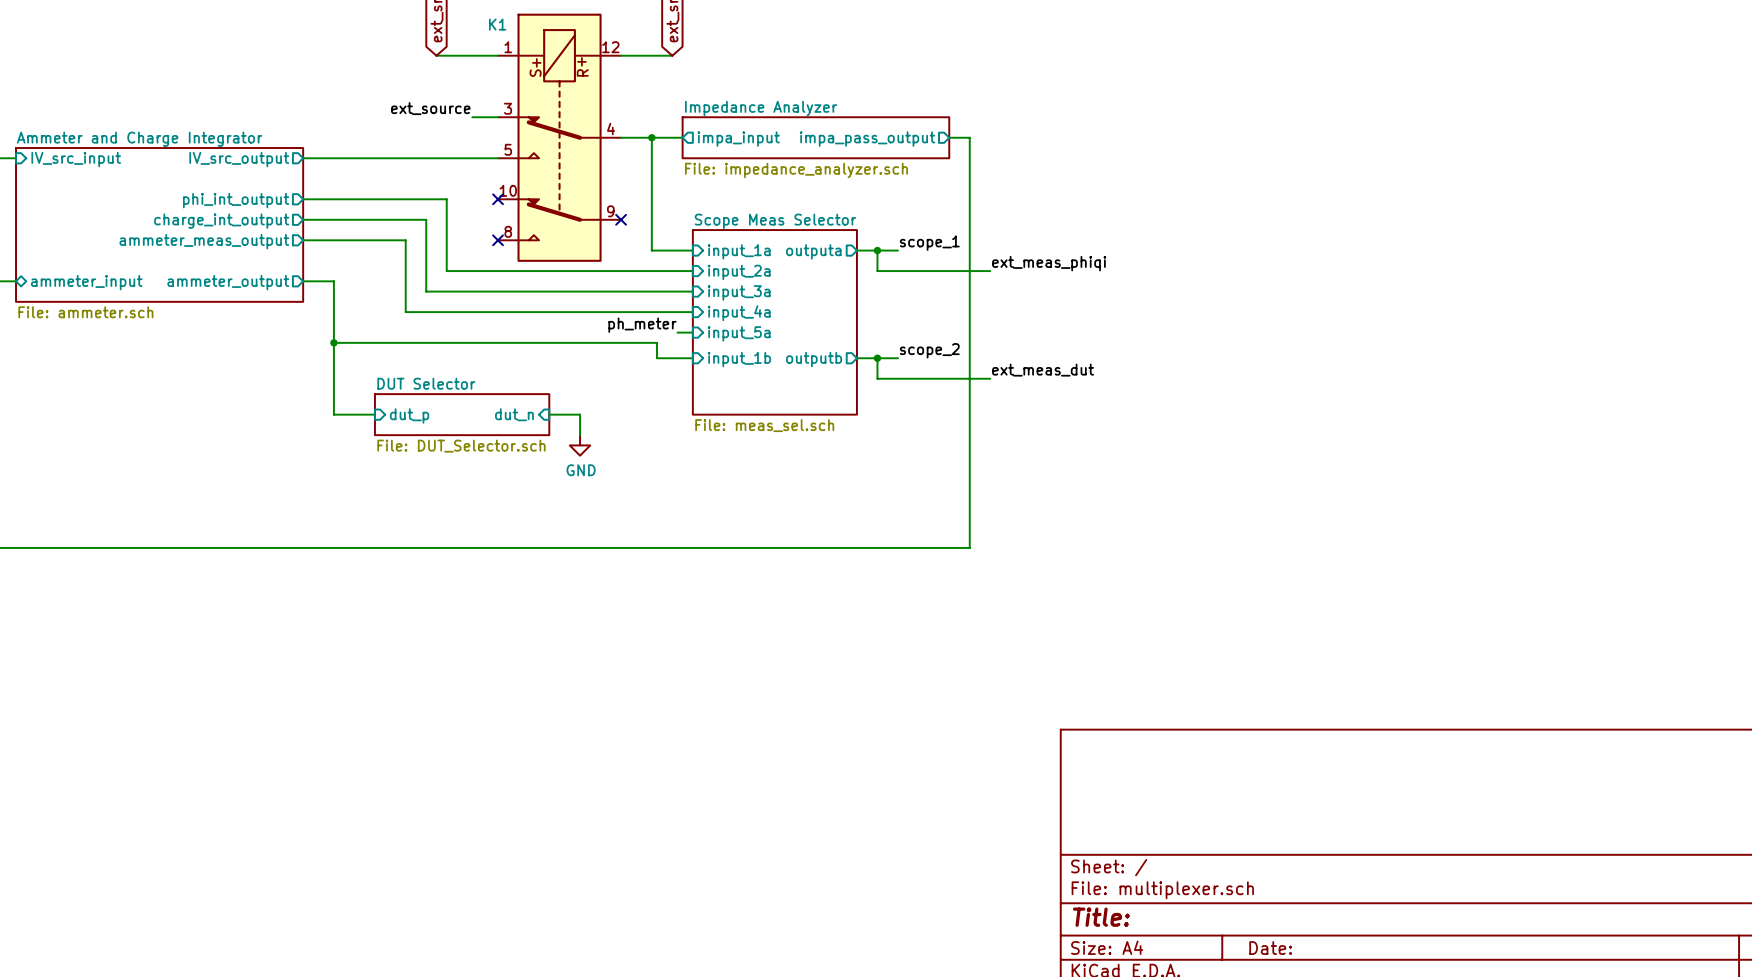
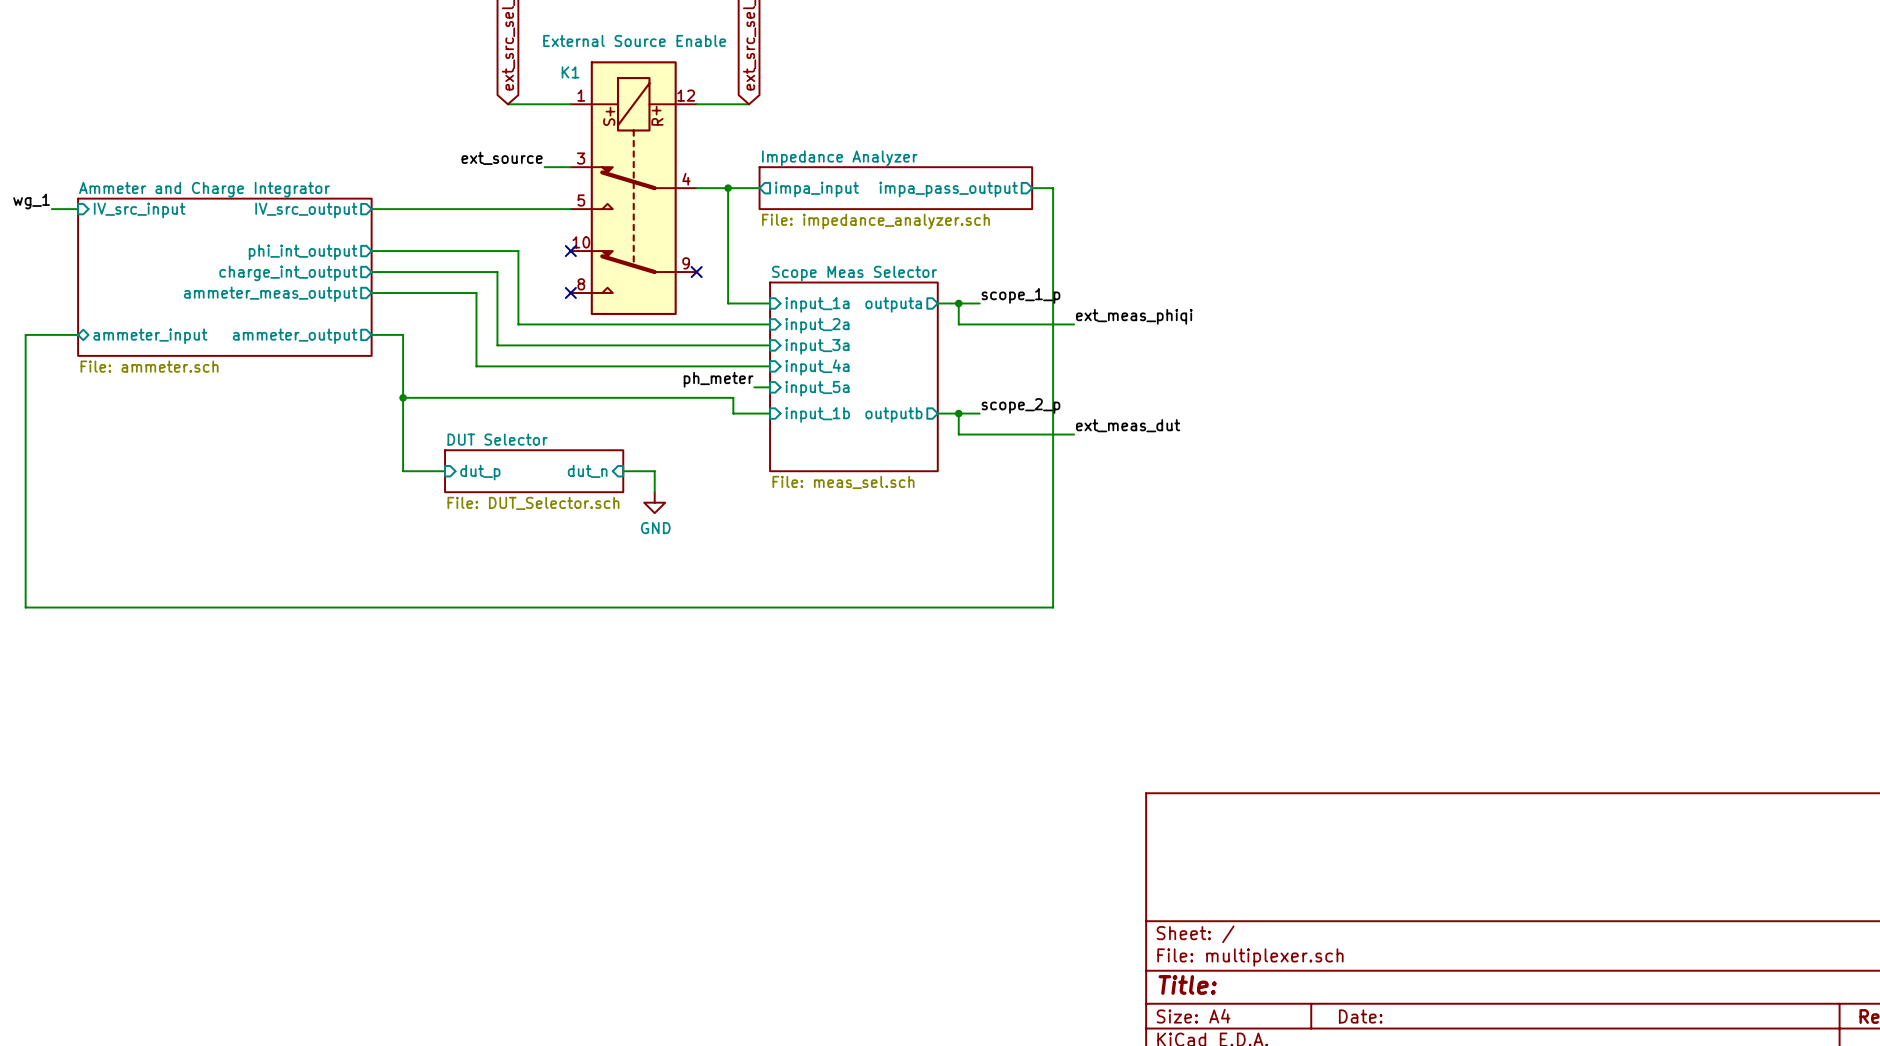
label: scope_1 (929, 243) -> scope_1_p (1020, 295)
label: scope_2 (929, 350) -> scope_2_p (1020, 405)

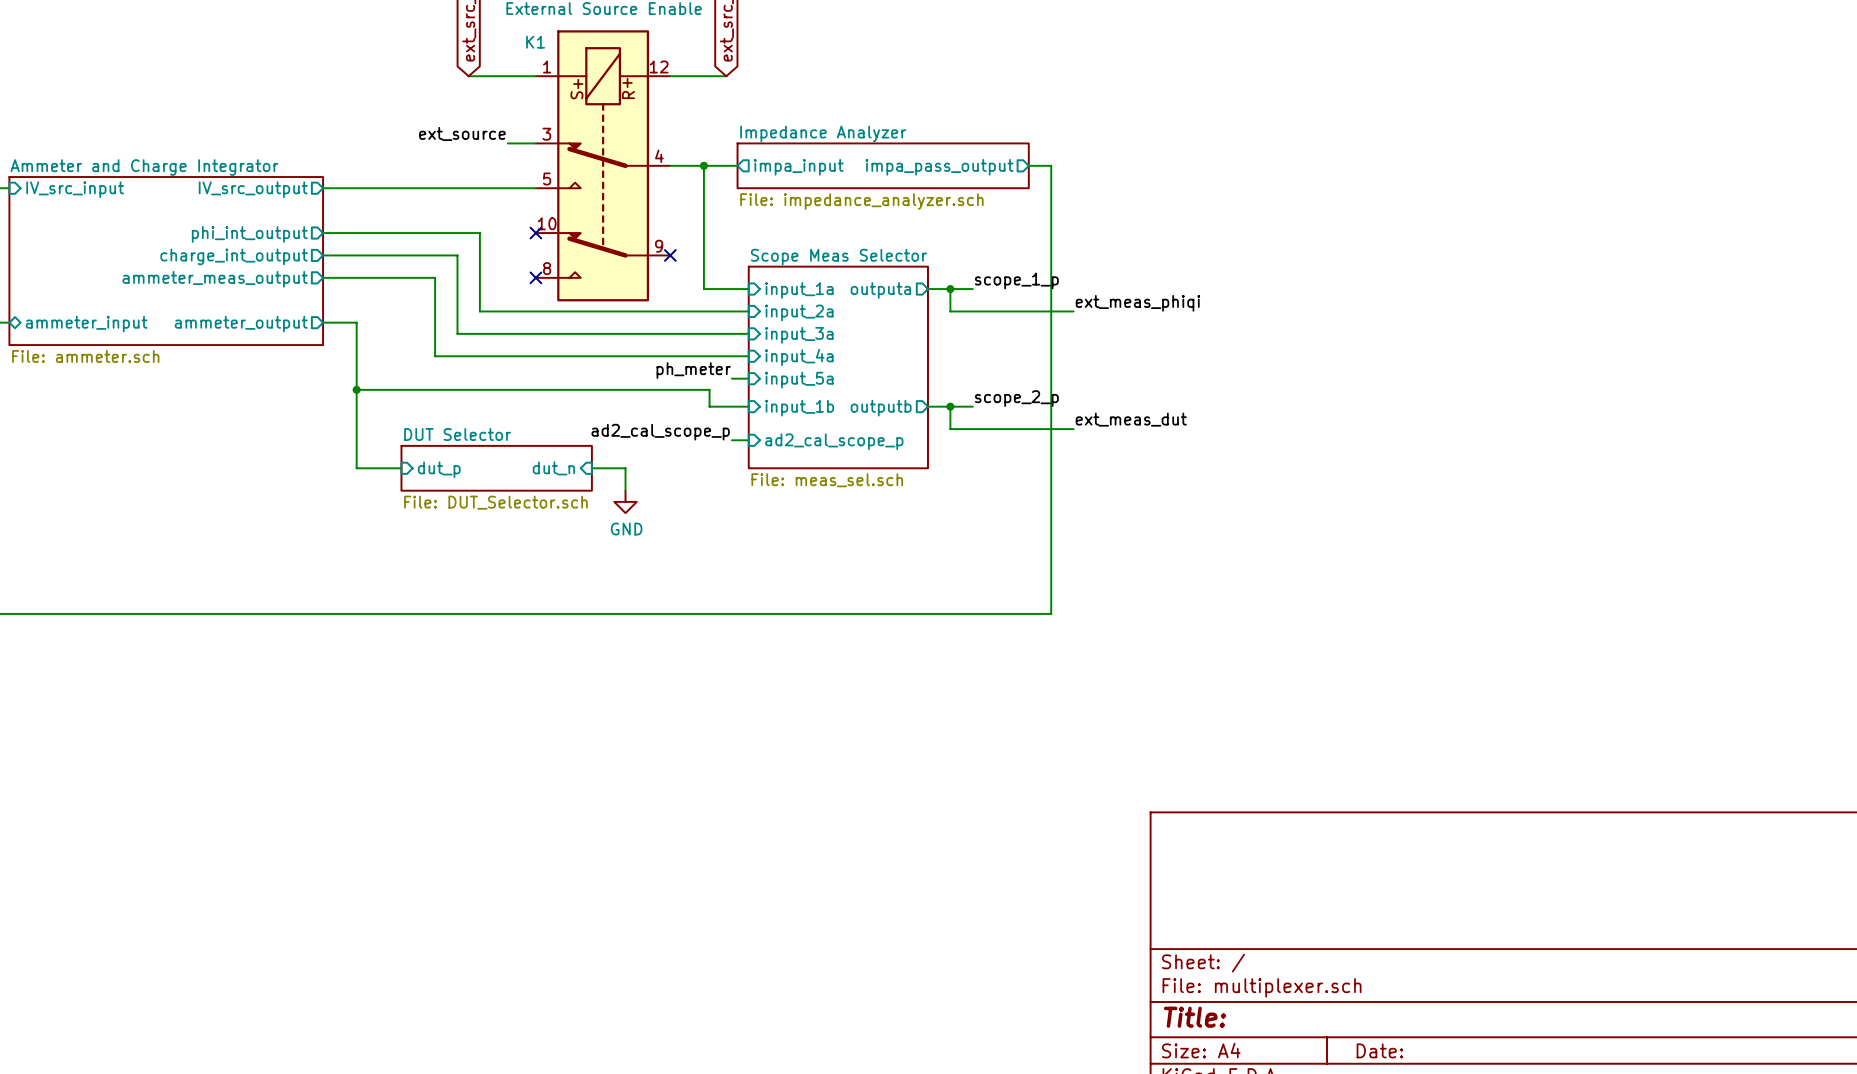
label: none -> ad2_cal_scope_p (660, 432)
wire: none -> (731, 440) (748, 440)
sheet pin: none -> ad2_cal_scope_p (834, 441)

